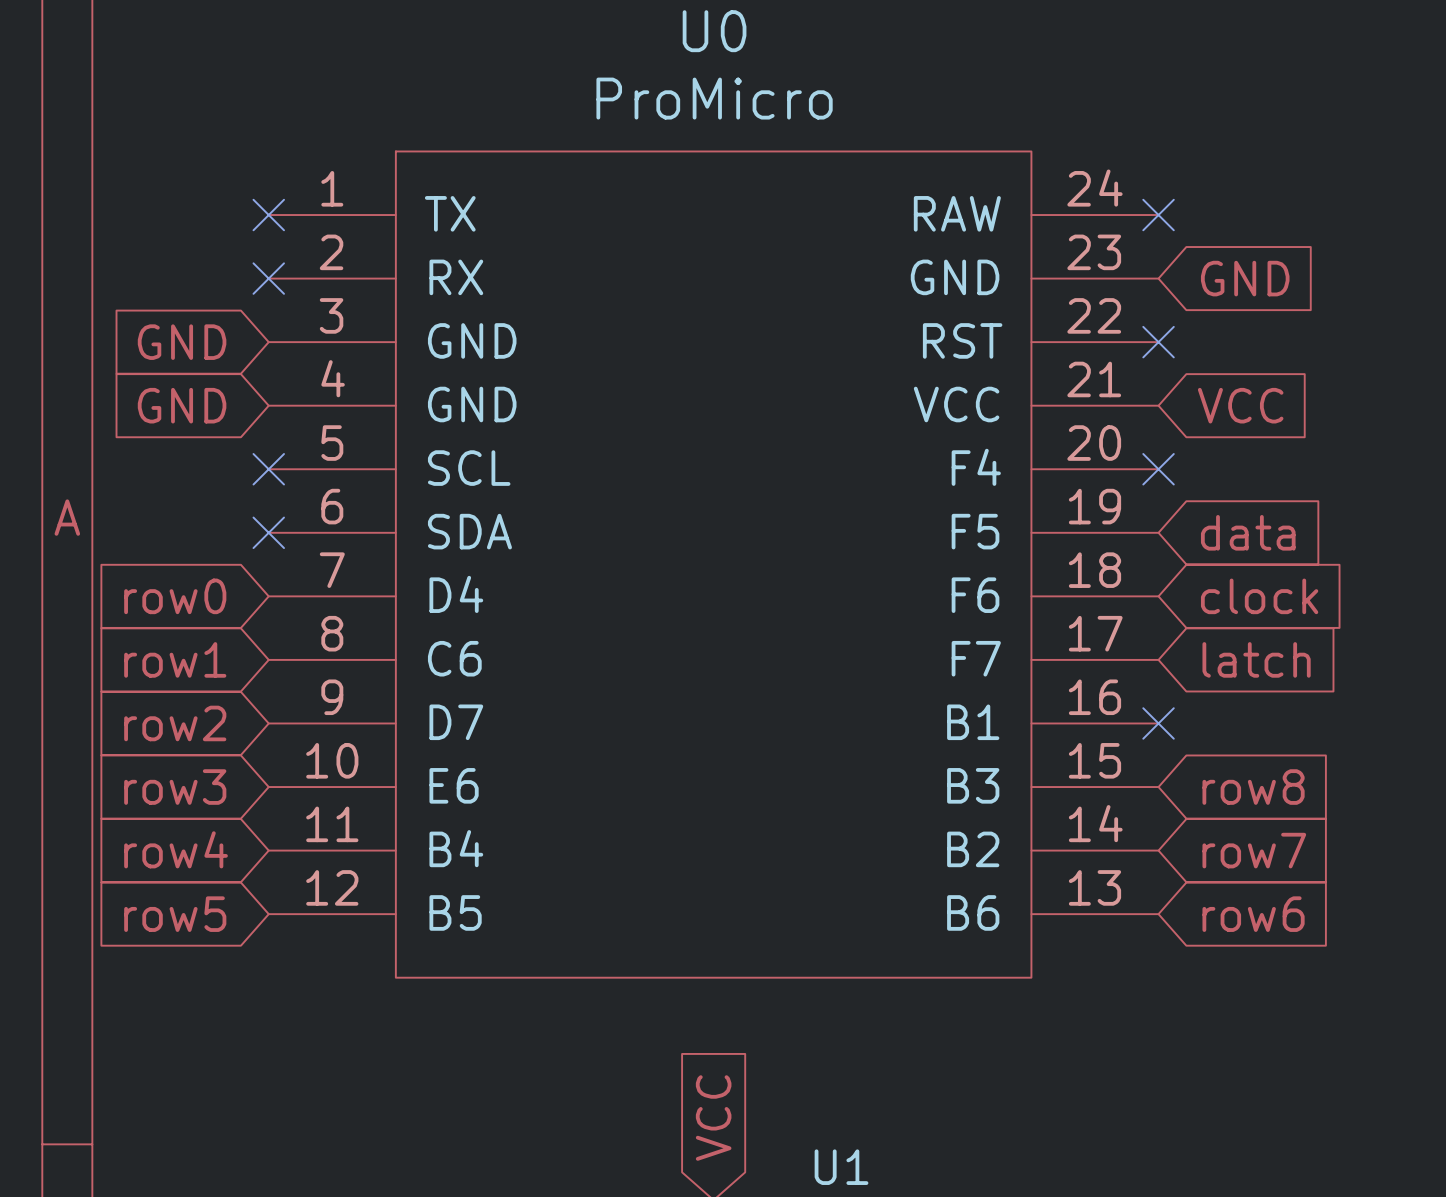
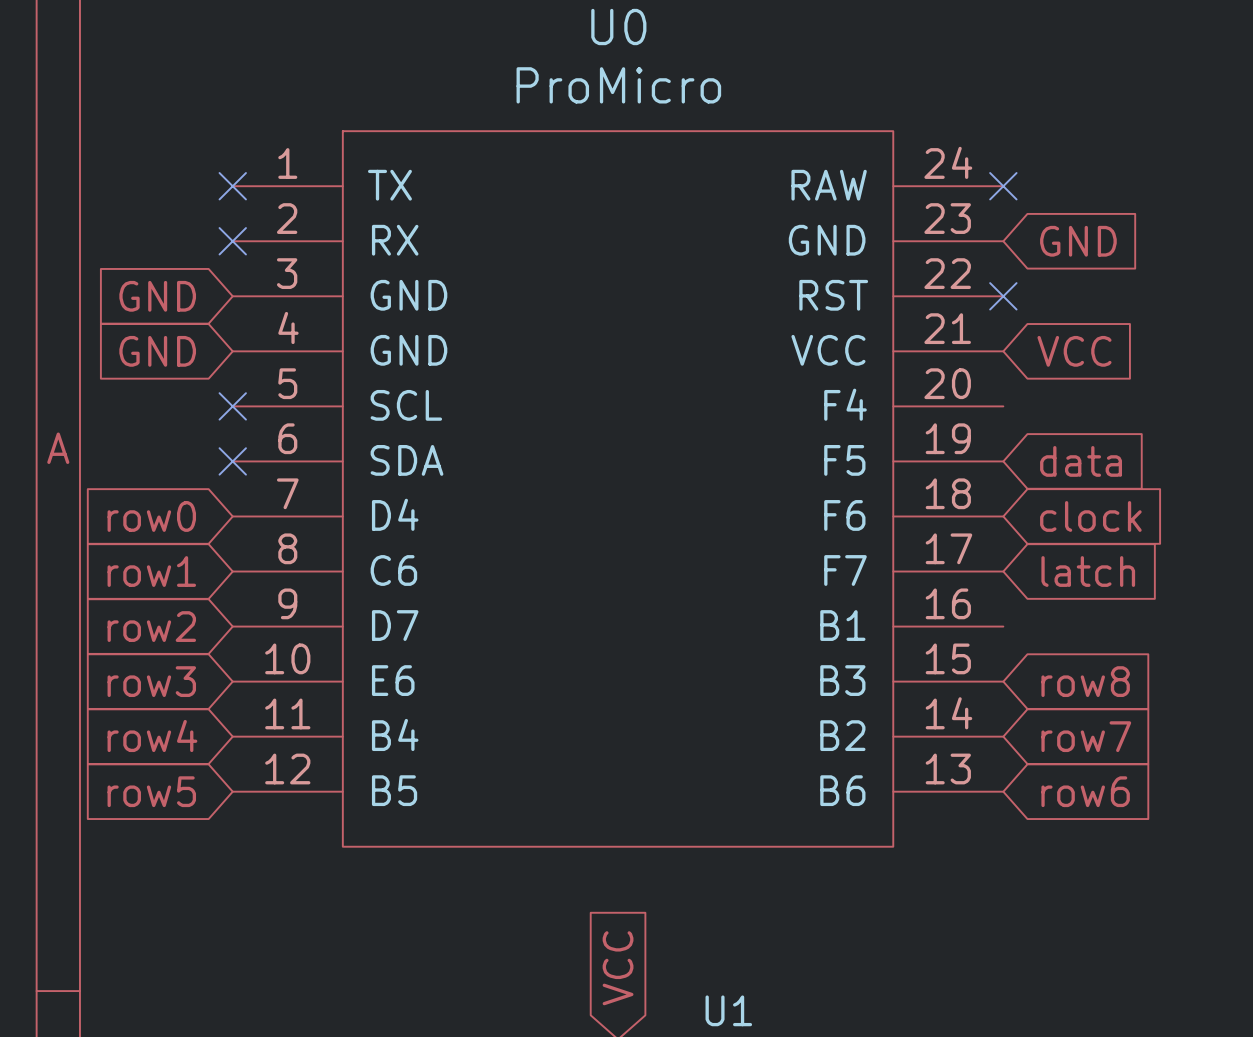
no-connect mark: (1158, 469) -> none
no-connect mark: (1158, 723) -> none

